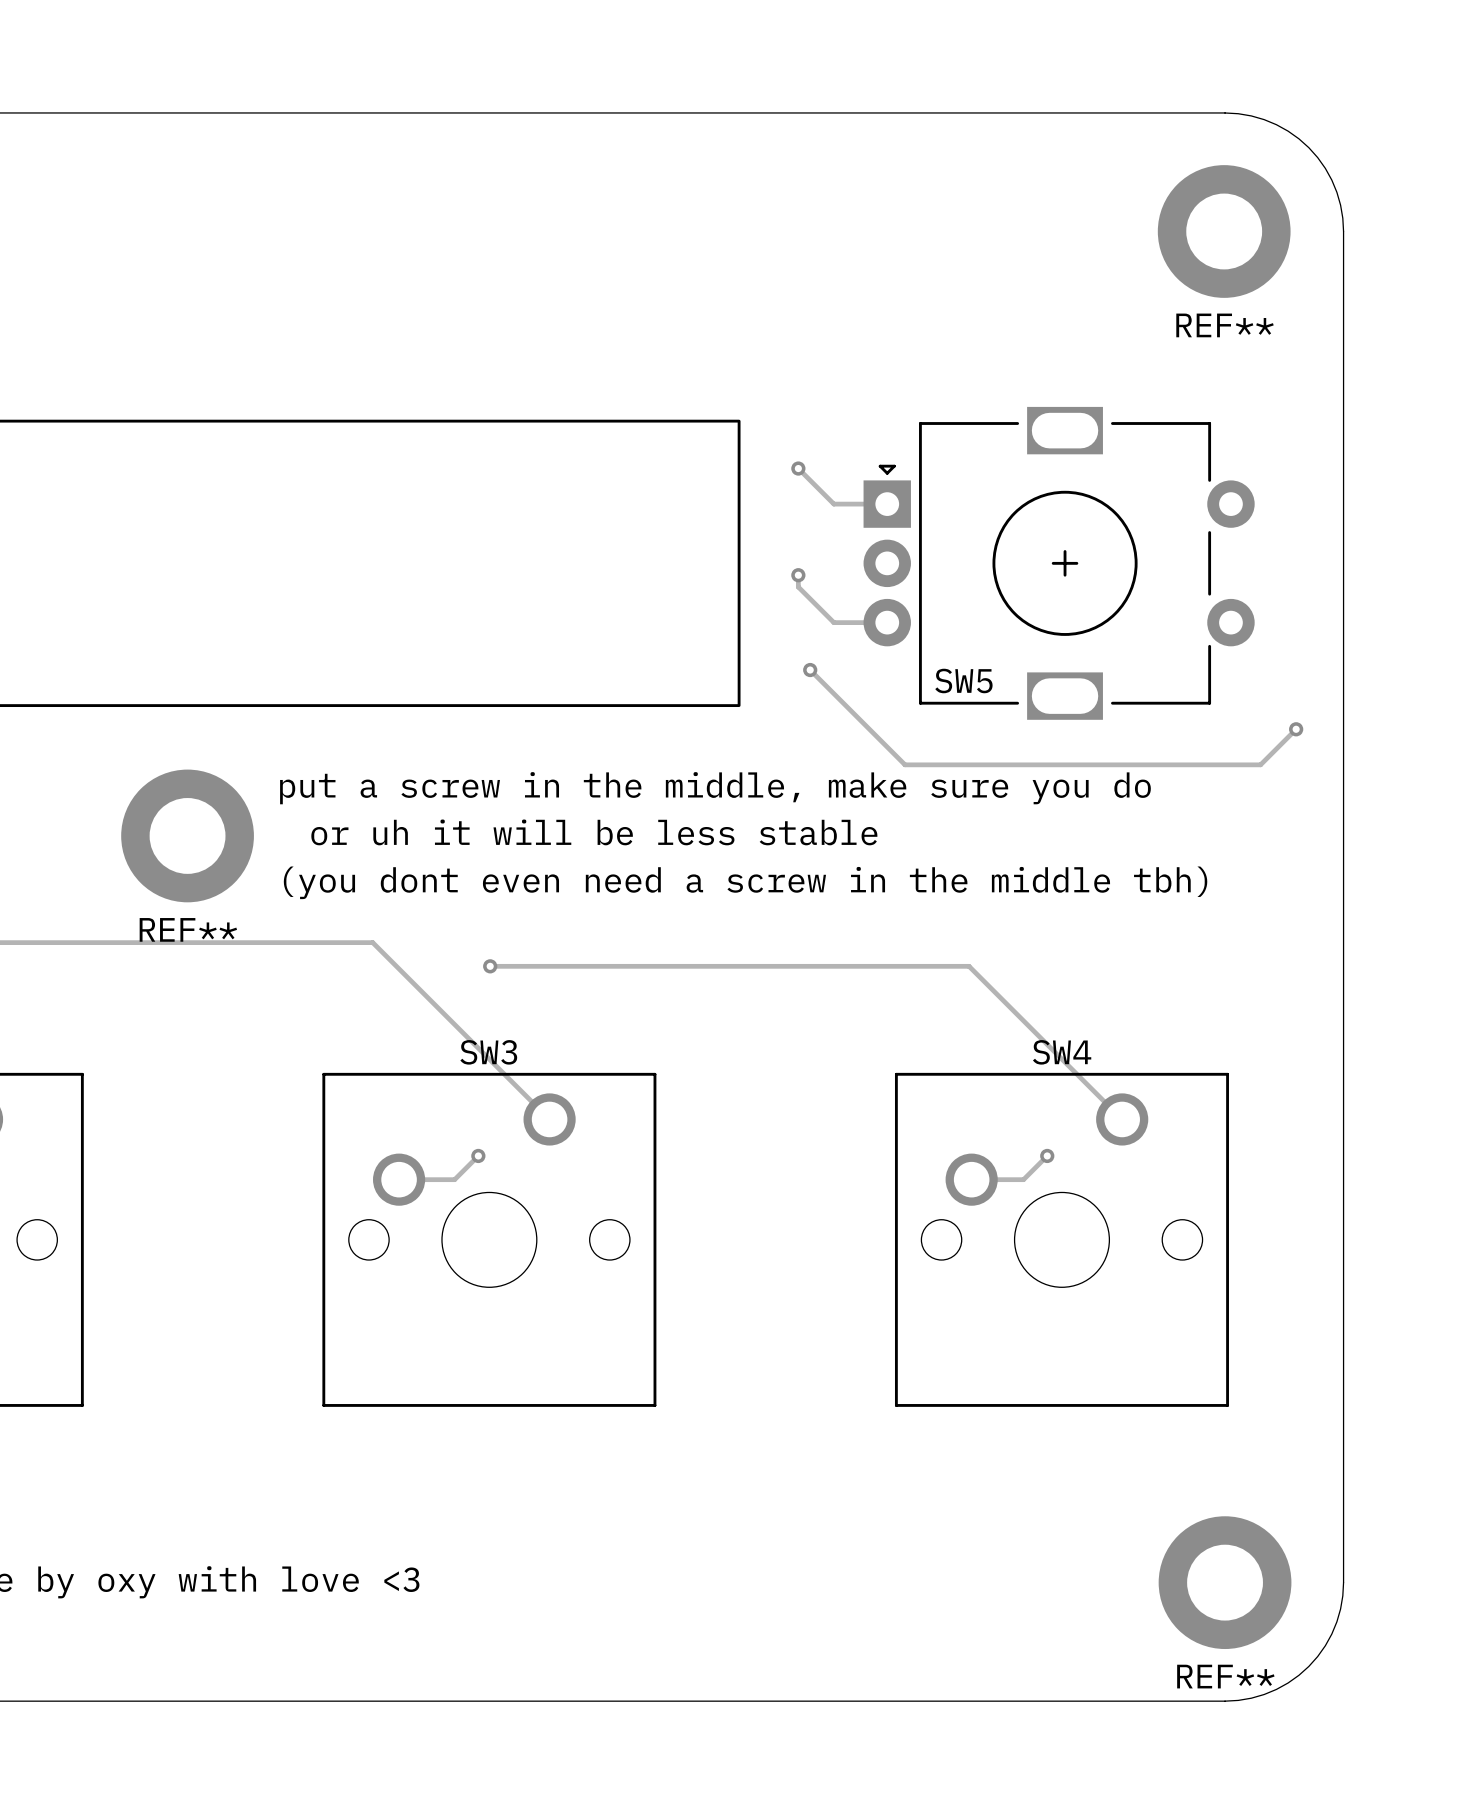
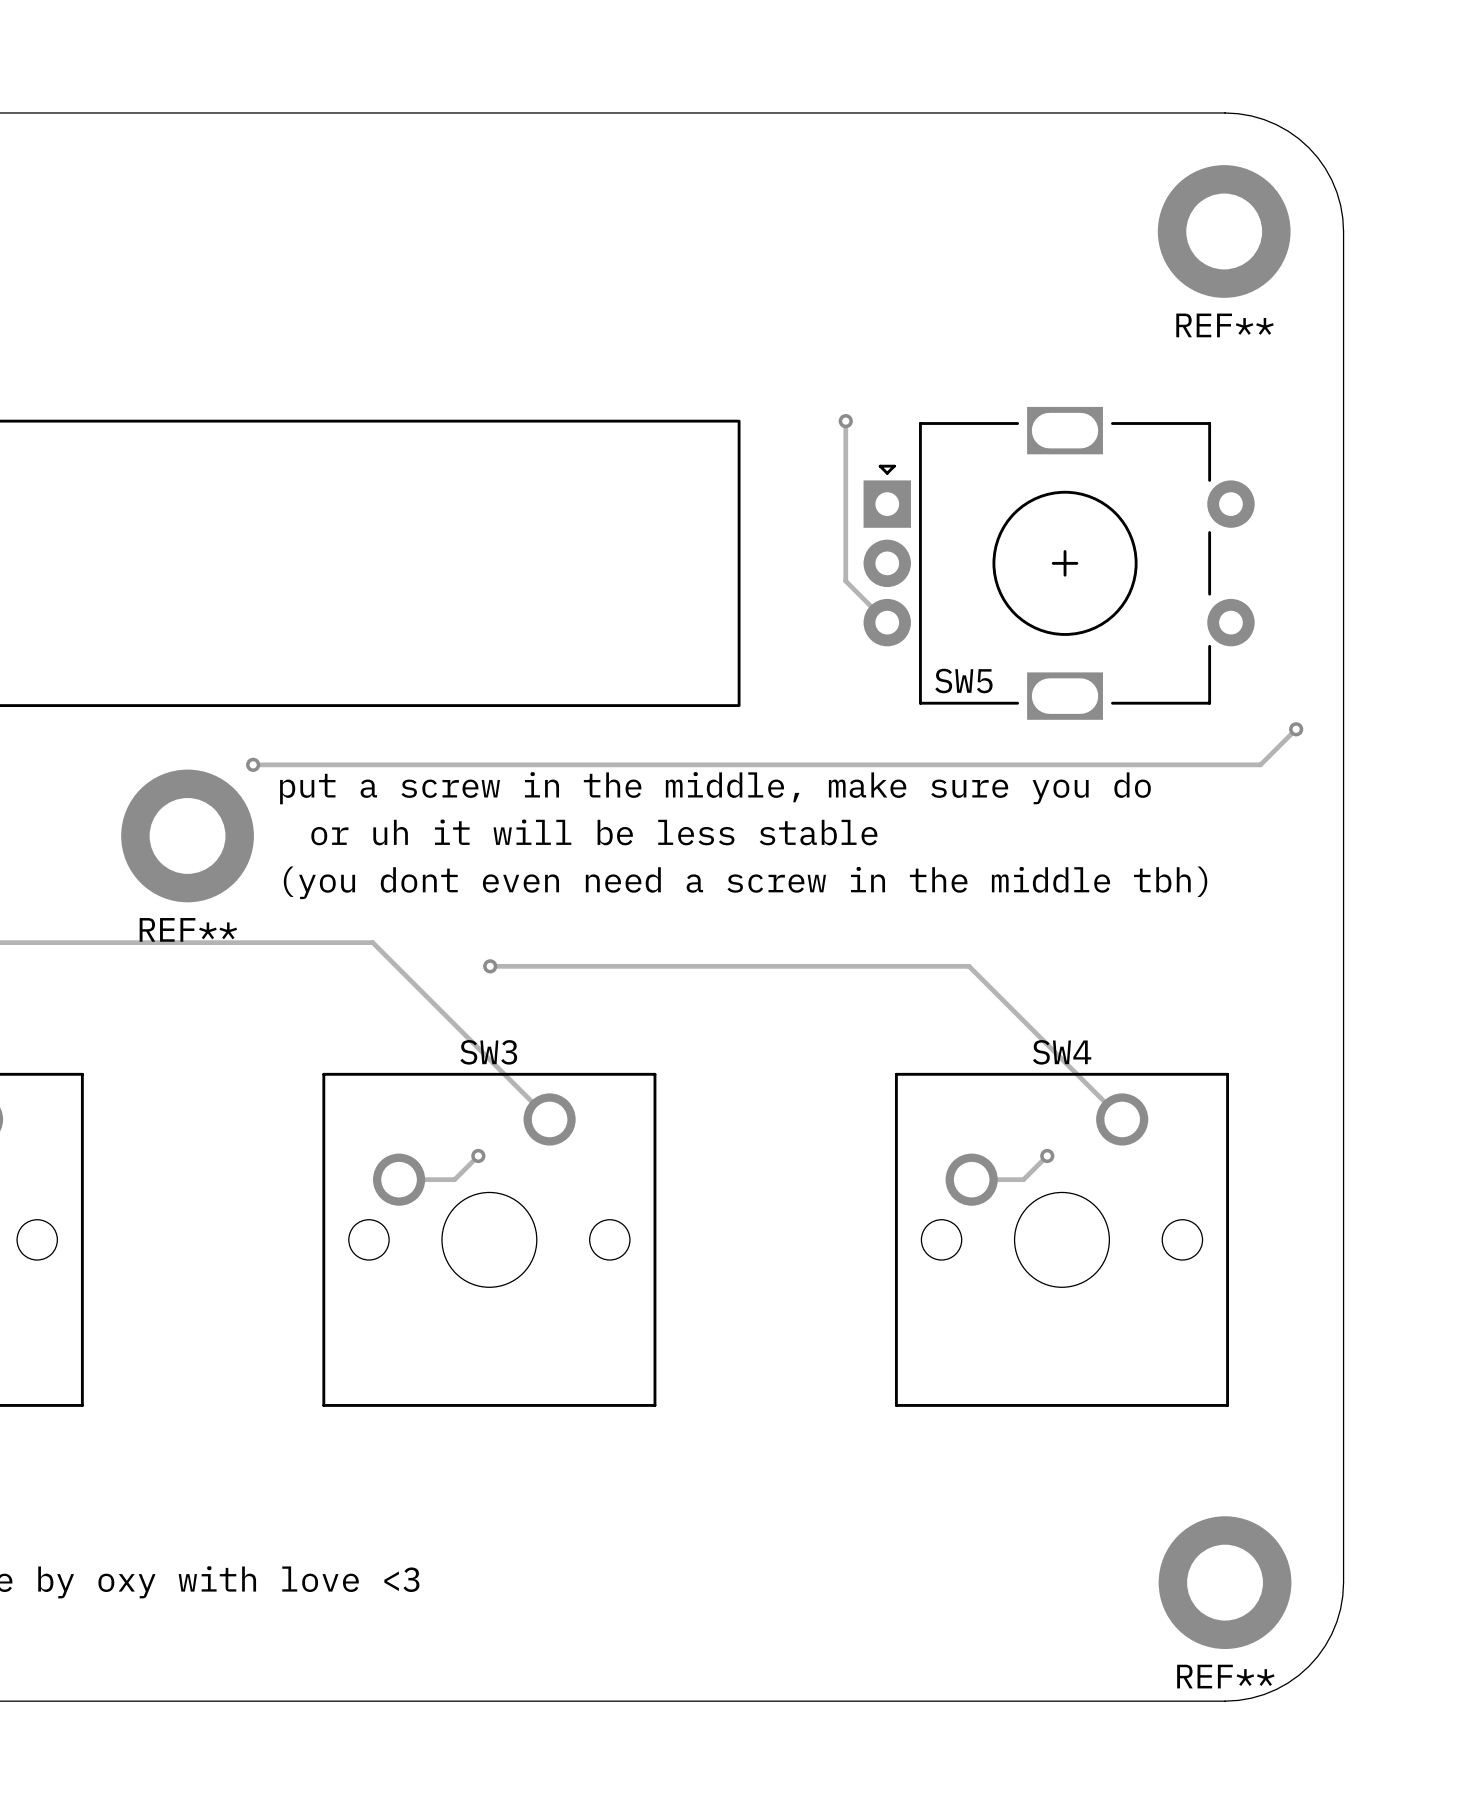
track: (798, 468) (833, 504) (887, 504) -> none
via position: (798, 468) -> (845, 421)
track: (798, 575) (798, 587) (833, 622) (887, 622) -> (845, 421) (845, 581) (887, 622)
via: (798, 575) -> none
track: (810, 670) (905, 764) -> (253, 764) (905, 764)
via: (810, 670) -> none
via: none -> (253, 764)

